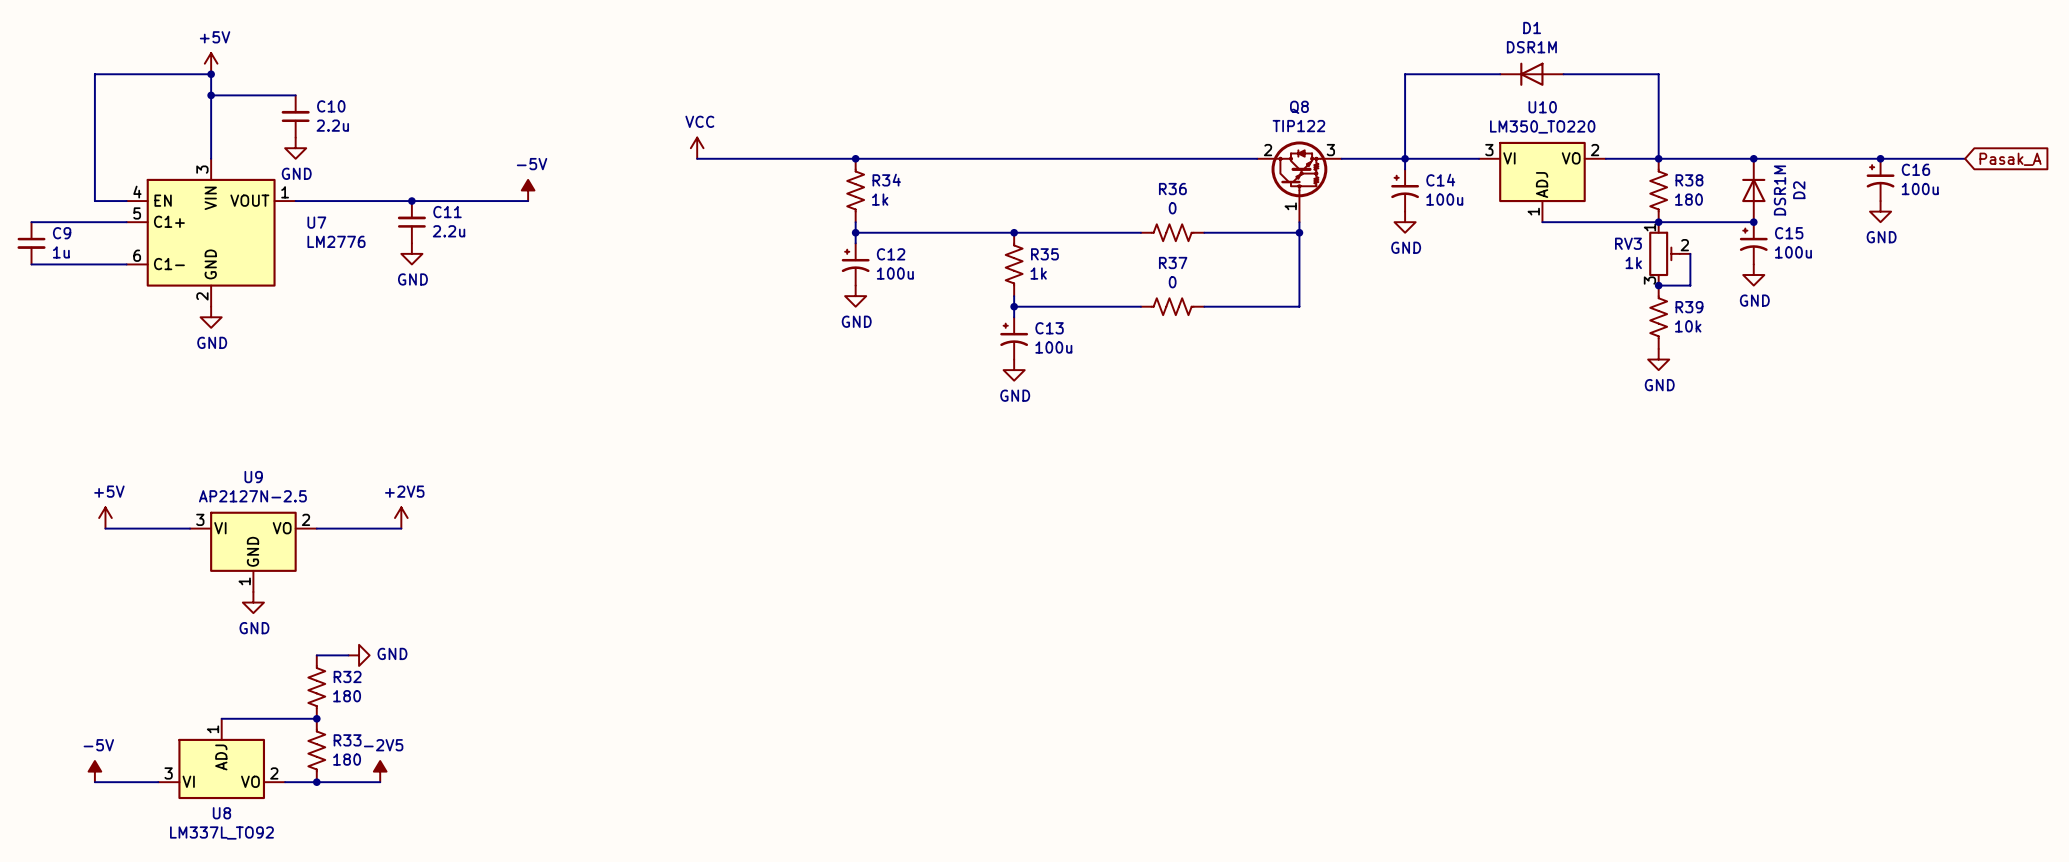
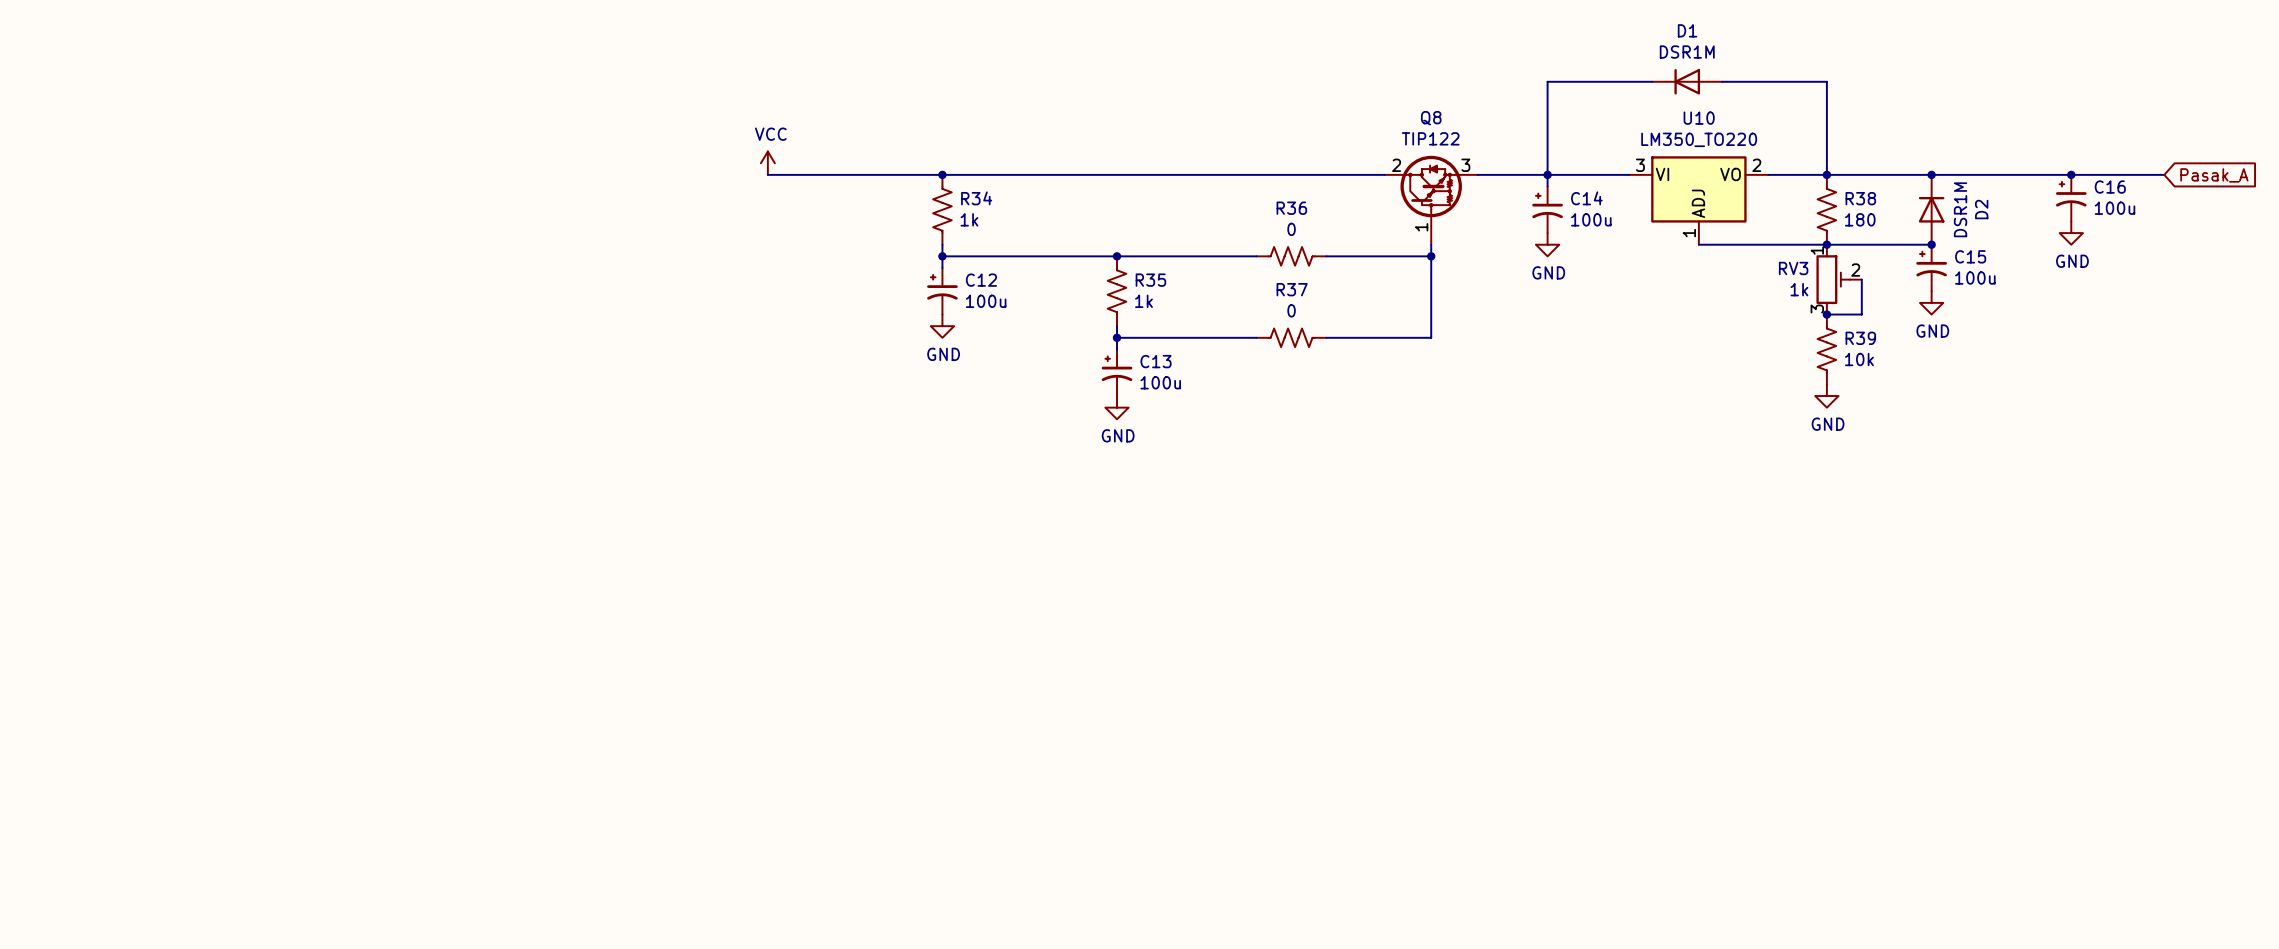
power symbol: +5V (211, 63) -> none
junction: (211, 74) -> none
wire: (211, 95) (295, 95) -> none
junction: (211, 95) -> none
C10: 2.2u (295, 116) -> none
power symbol: GND (295, 148) -> none
wire: (211, 158) (211, 74) (94, 74) (94, 201) (126, 201) -> none
power symbol: -5V (528, 190) -> none
wire: (295, 201) (528, 201) -> none
junction: (411, 201) -> none
wire: (31, 222) (126, 222) -> none
C11: 2.2u (411, 222) -> none
U7: LM2776 (211, 232) -> none
C9: 1u (31, 243) -> none
power symbol: GND (411, 253) -> none
wire: (31, 264) (126, 264) -> none
power symbol: GND (211, 317) -> none
power symbol: +5V (105, 518) -> none
power symbol: +2V5 (401, 518) -> none
wire: (105, 528) (190, 528) -> none
wire: (316, 528) (401, 528) -> none
U9: AP2127N-2.5 (253, 551) -> none
power symbol: GND (253, 602) -> none
wire: (316, 655) (348, 655) -> none
power symbol: GND (359, 655) -> none
R32: 180 (316, 687) -> none
wire: (221, 718) (316, 718) -> none
junction: (316, 718) -> none
R33: 180 (316, 750) -> none
U8: LM337L_TO92 (221, 758) -> none
power symbol: -5V (94, 771) -> none
power symbol: -2V5 (380, 771) -> none
wire: (94, 782) (158, 782) -> none
wire: (285, 782) (380, 782) -> none
junction: (316, 782) -> none

